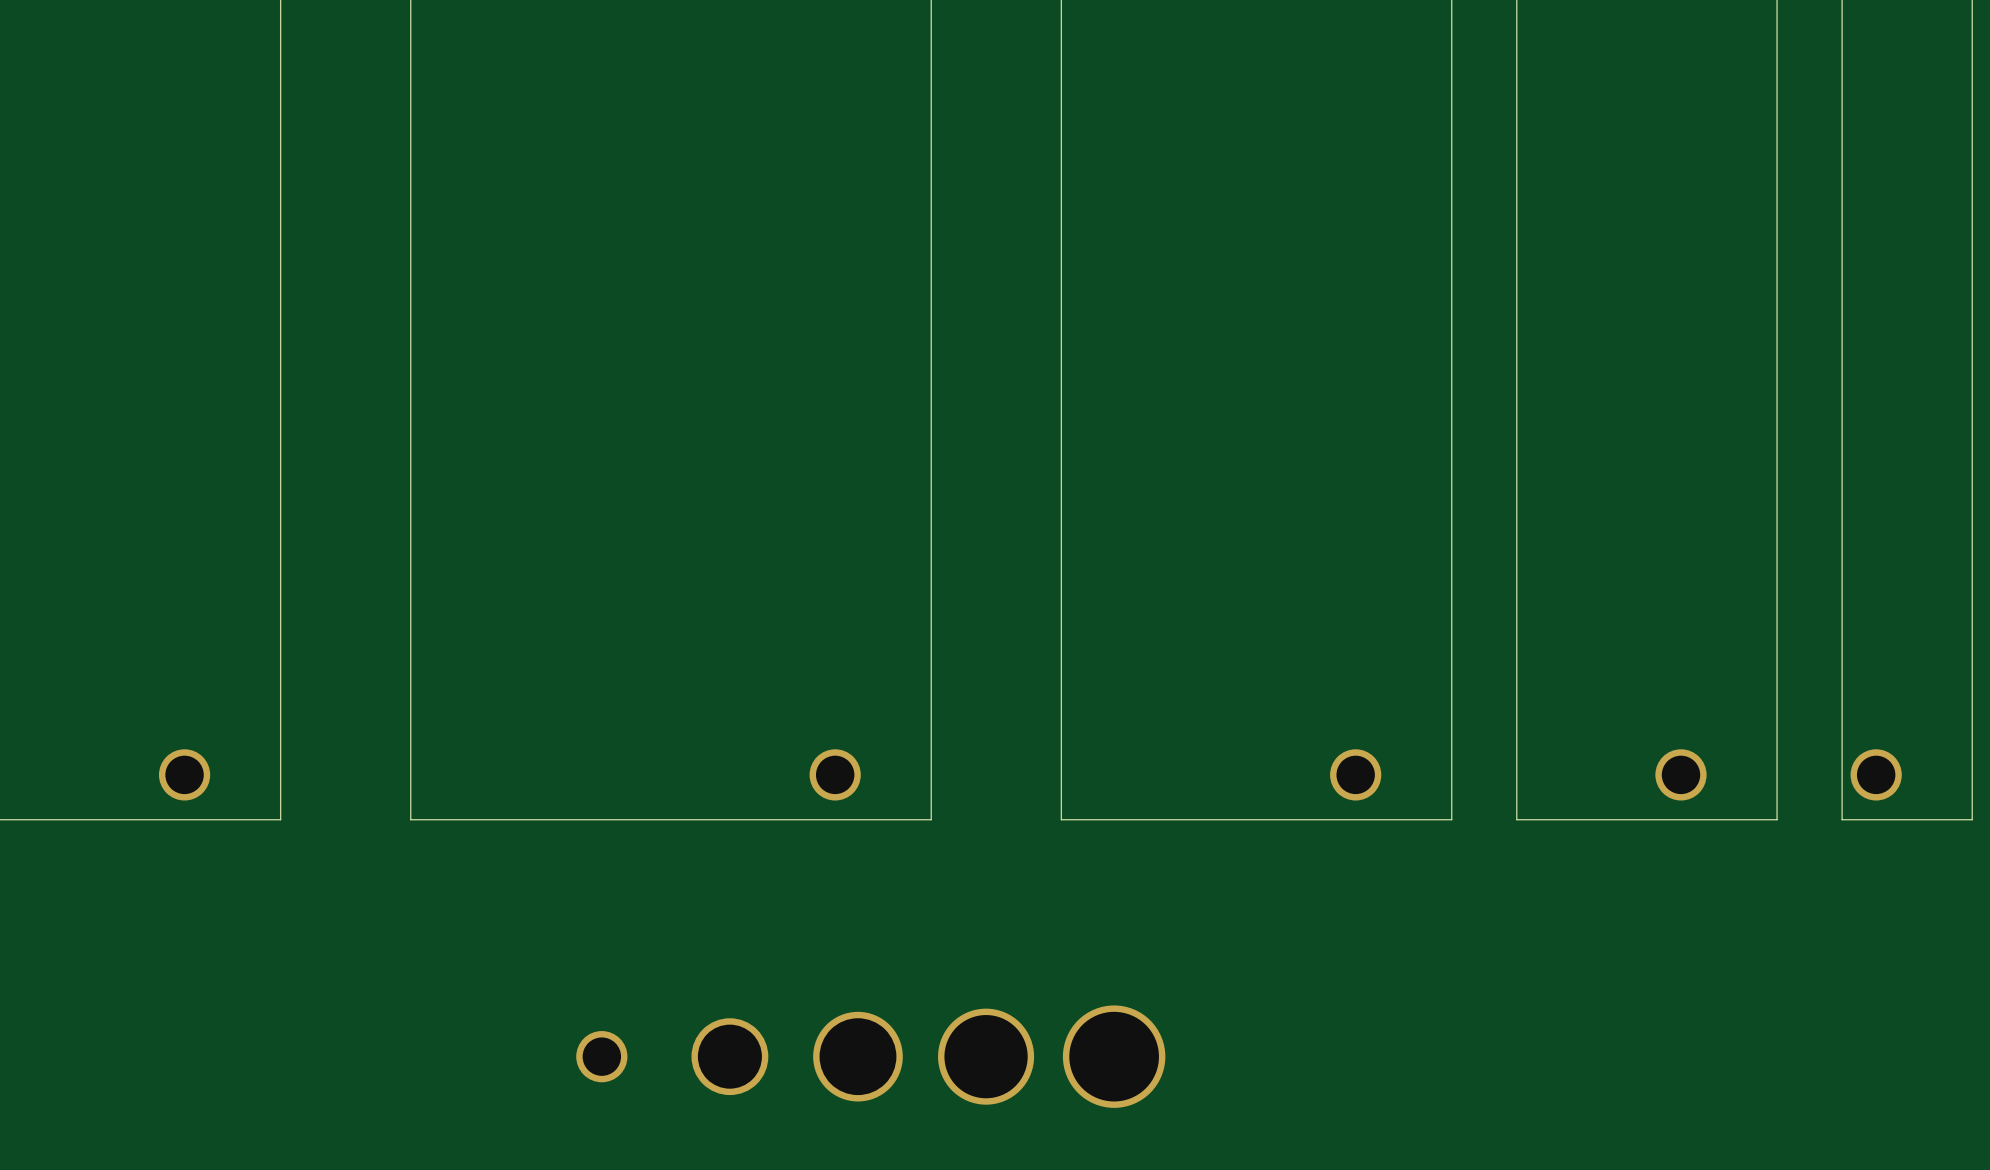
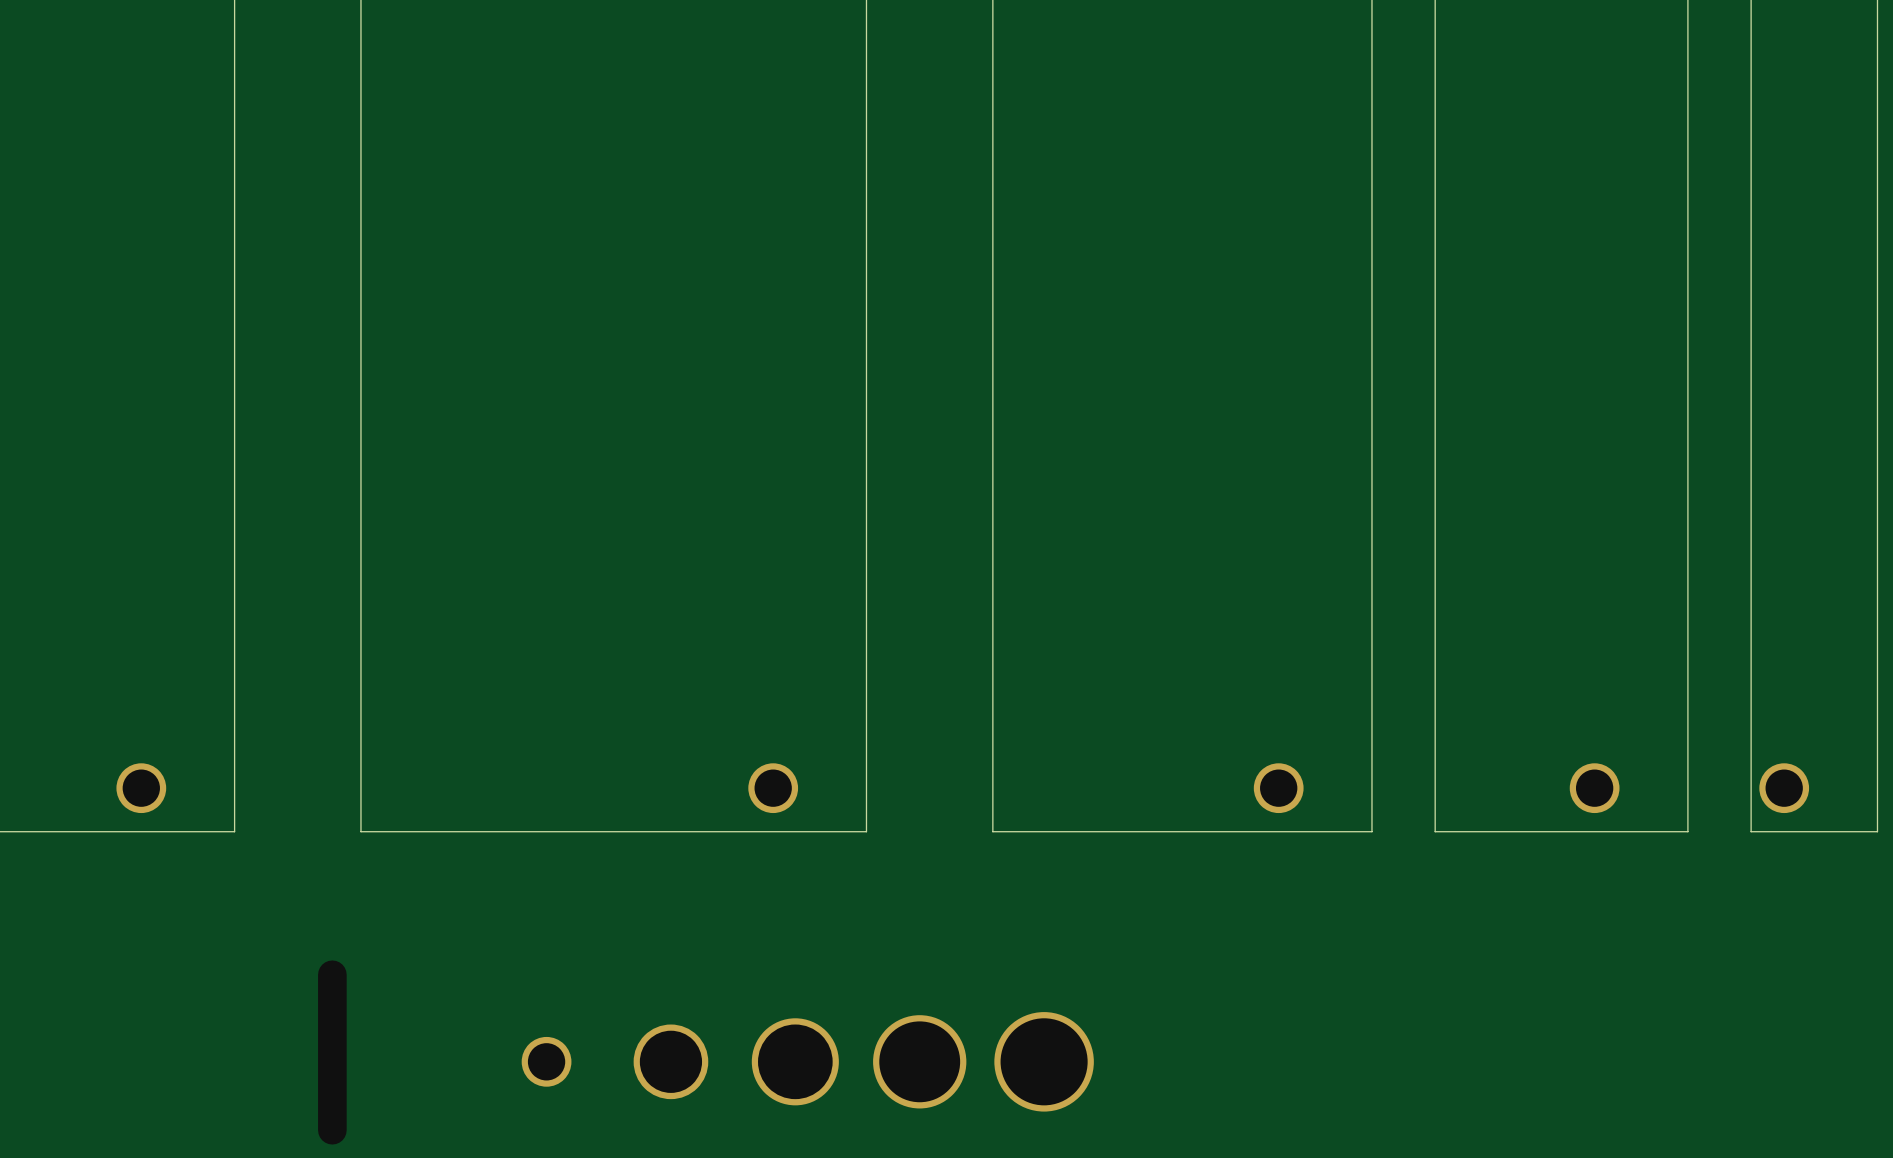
part: none -> (332, 1052)

